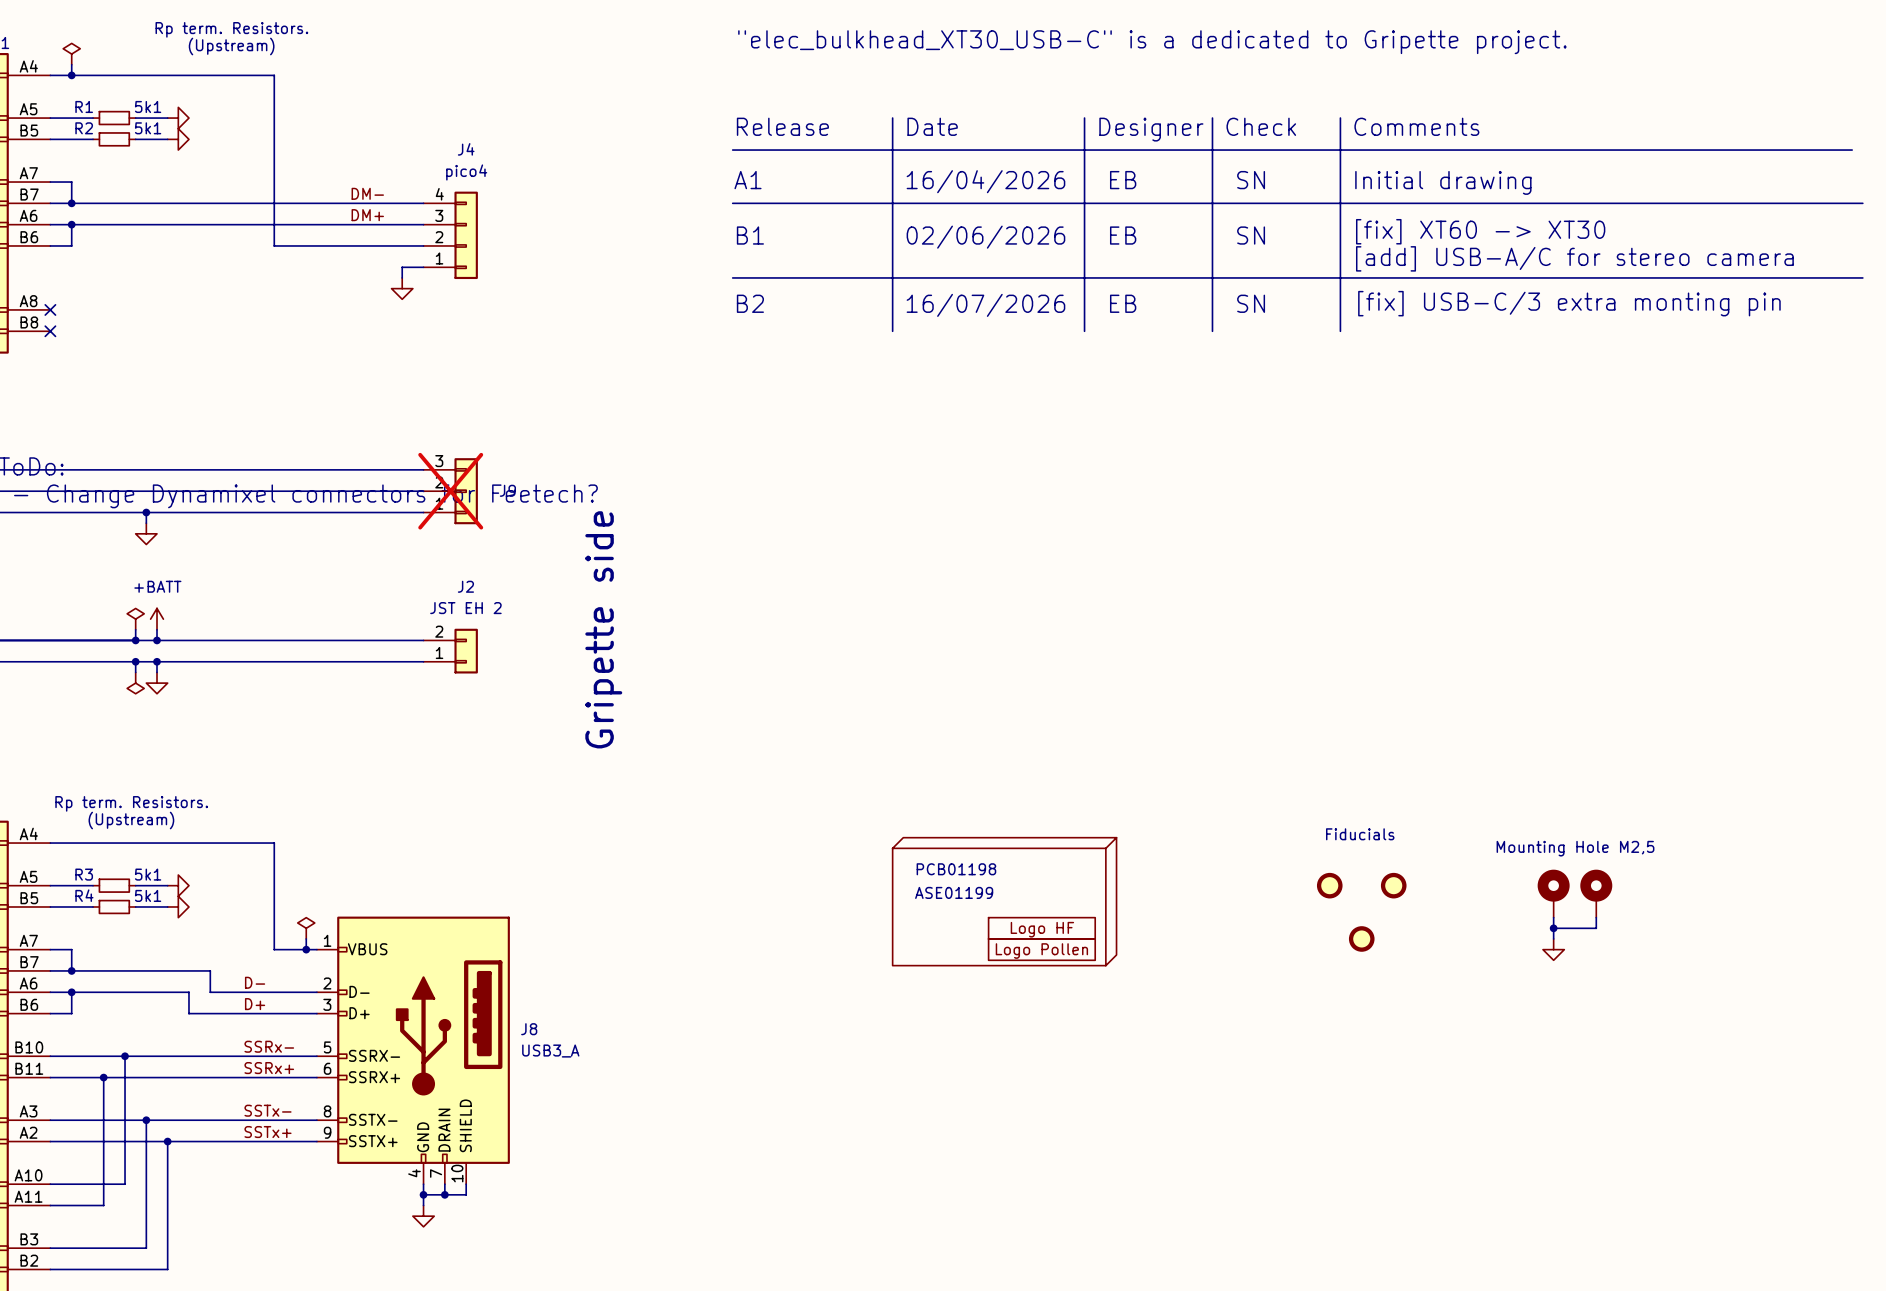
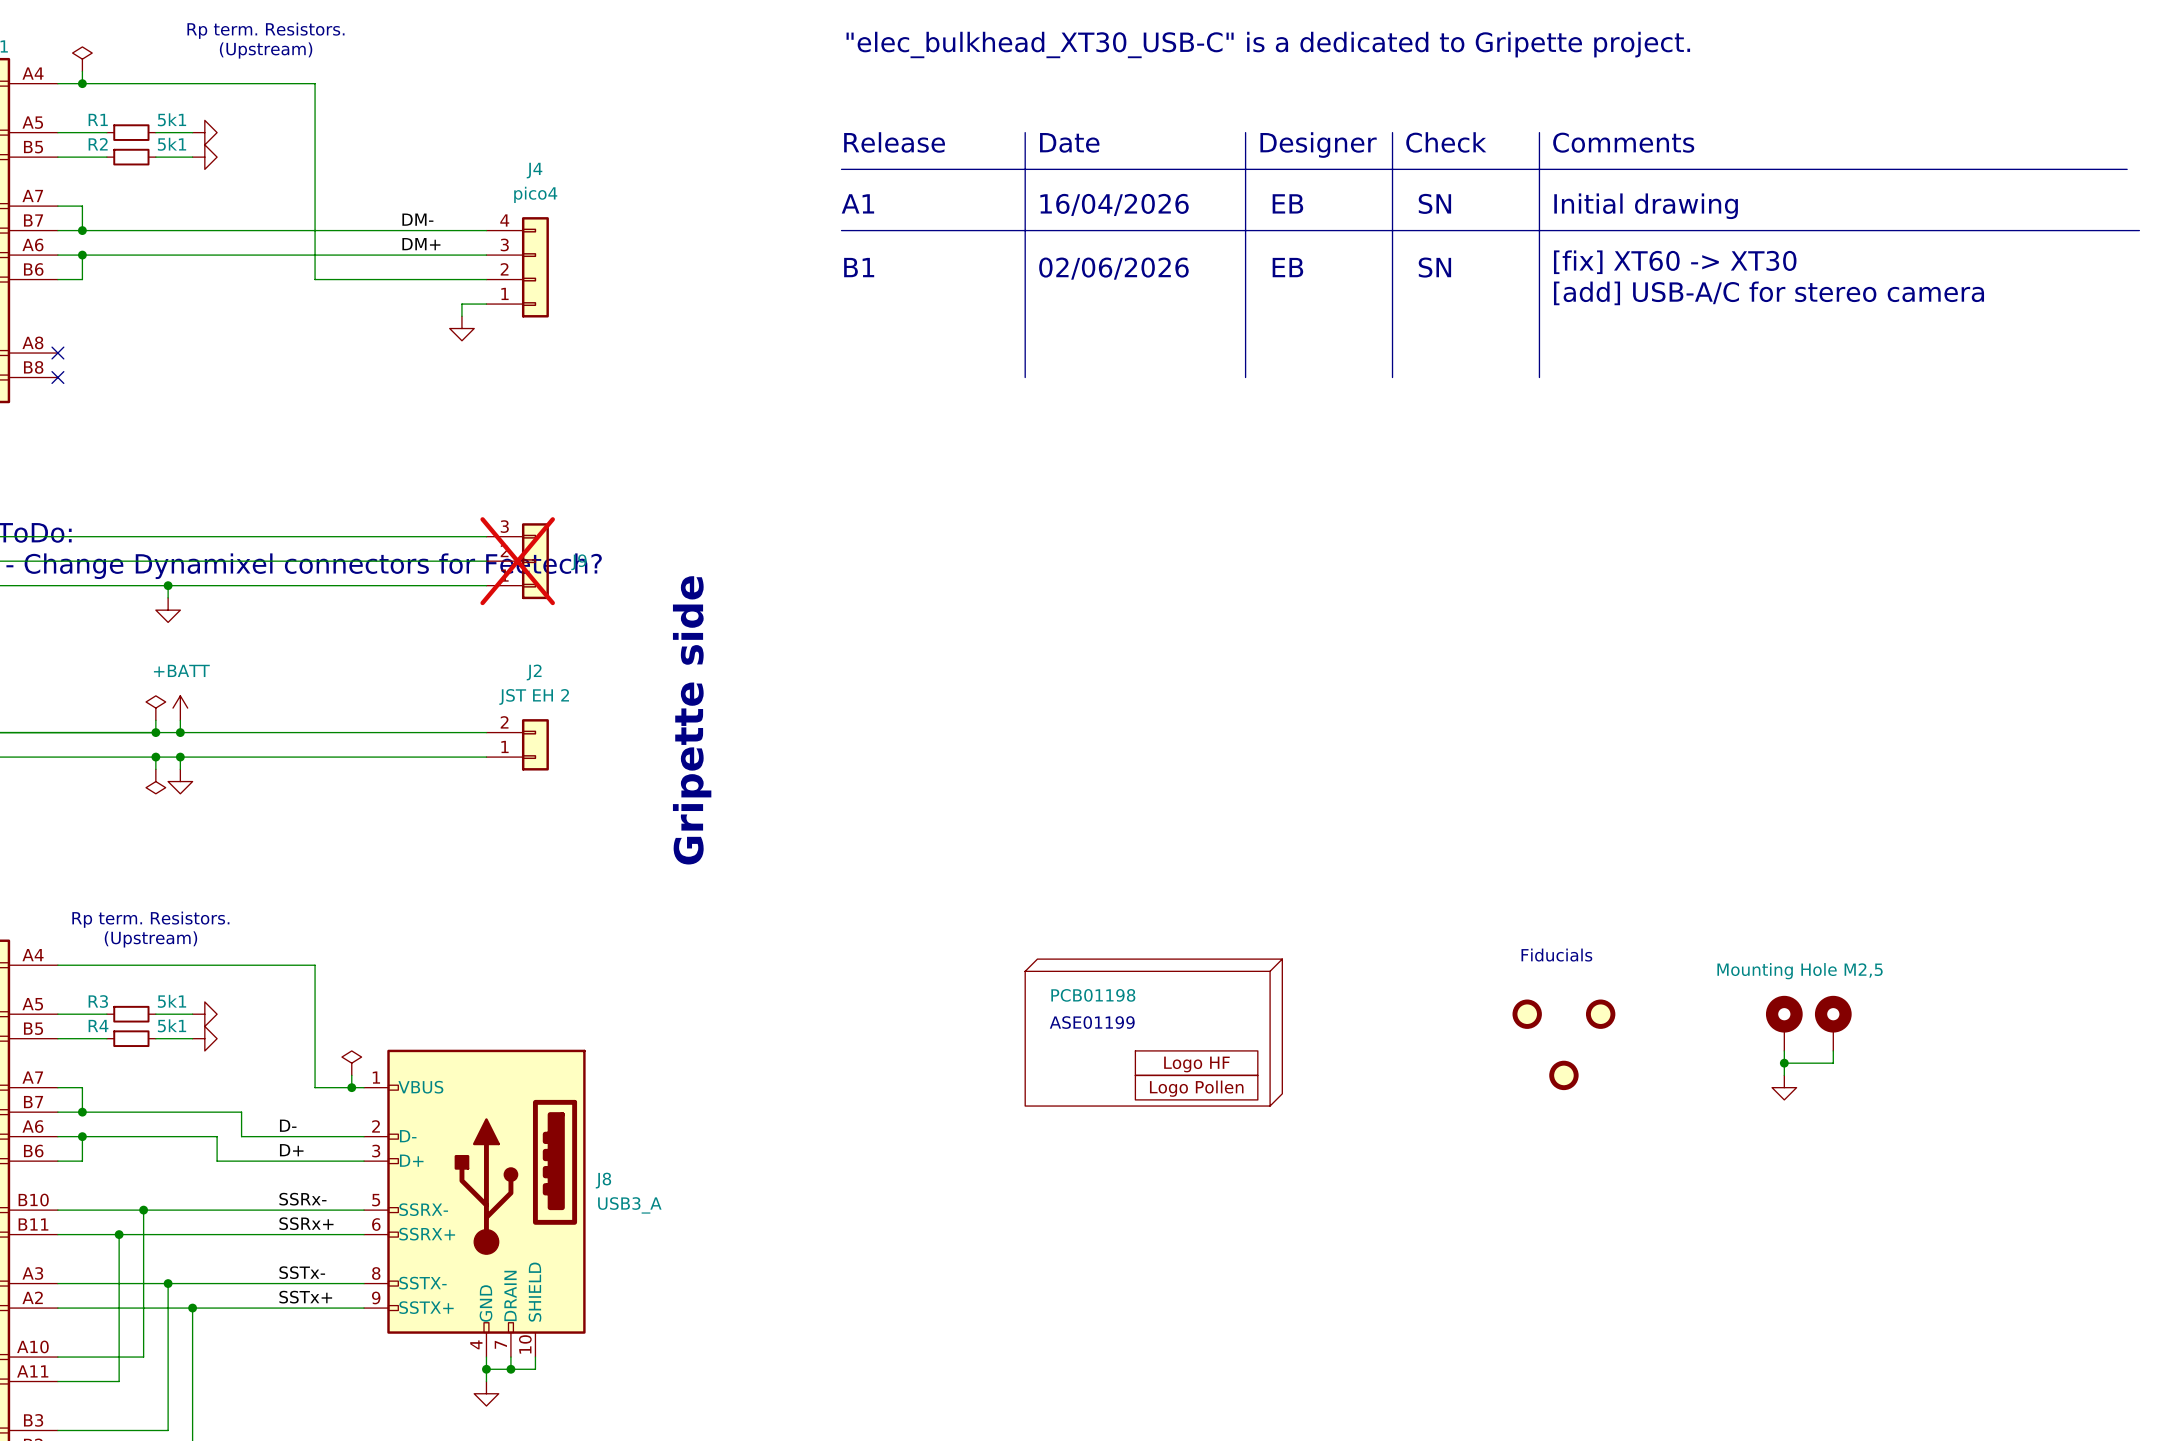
line: (732, 277) (1862, 277) -> none
text: B2 (750, 303) -> none
text: EB (1123, 303) -> none
text: SN (1251, 303) -> none
text: [fix] USB-C/3 extra monting pin (1569, 303) -> none
text: 16/07/2026 (985, 305) -> none

